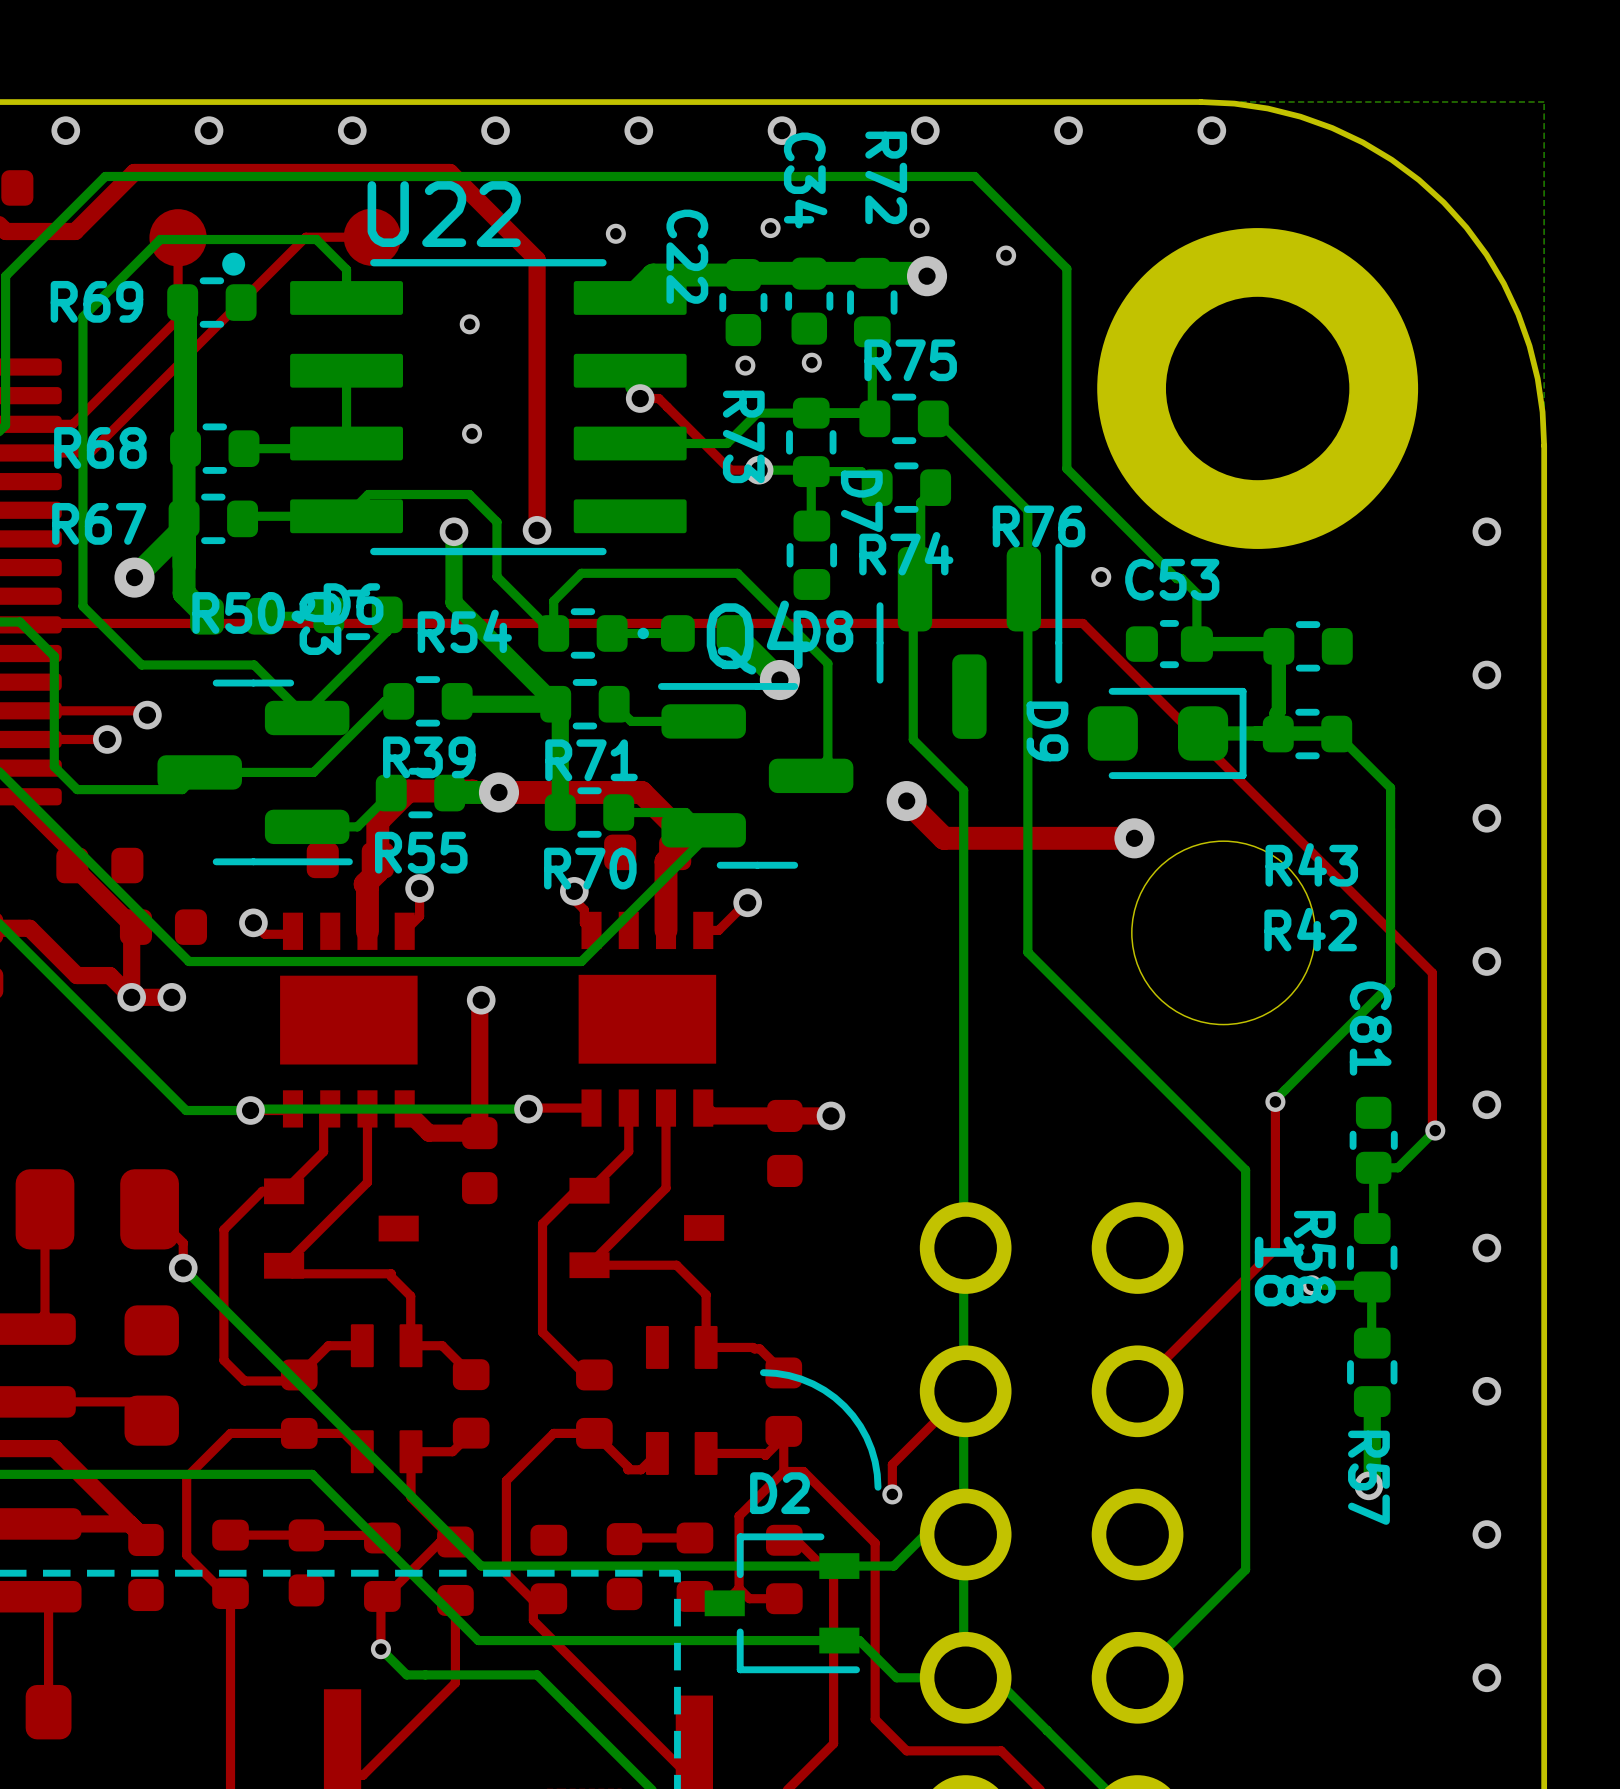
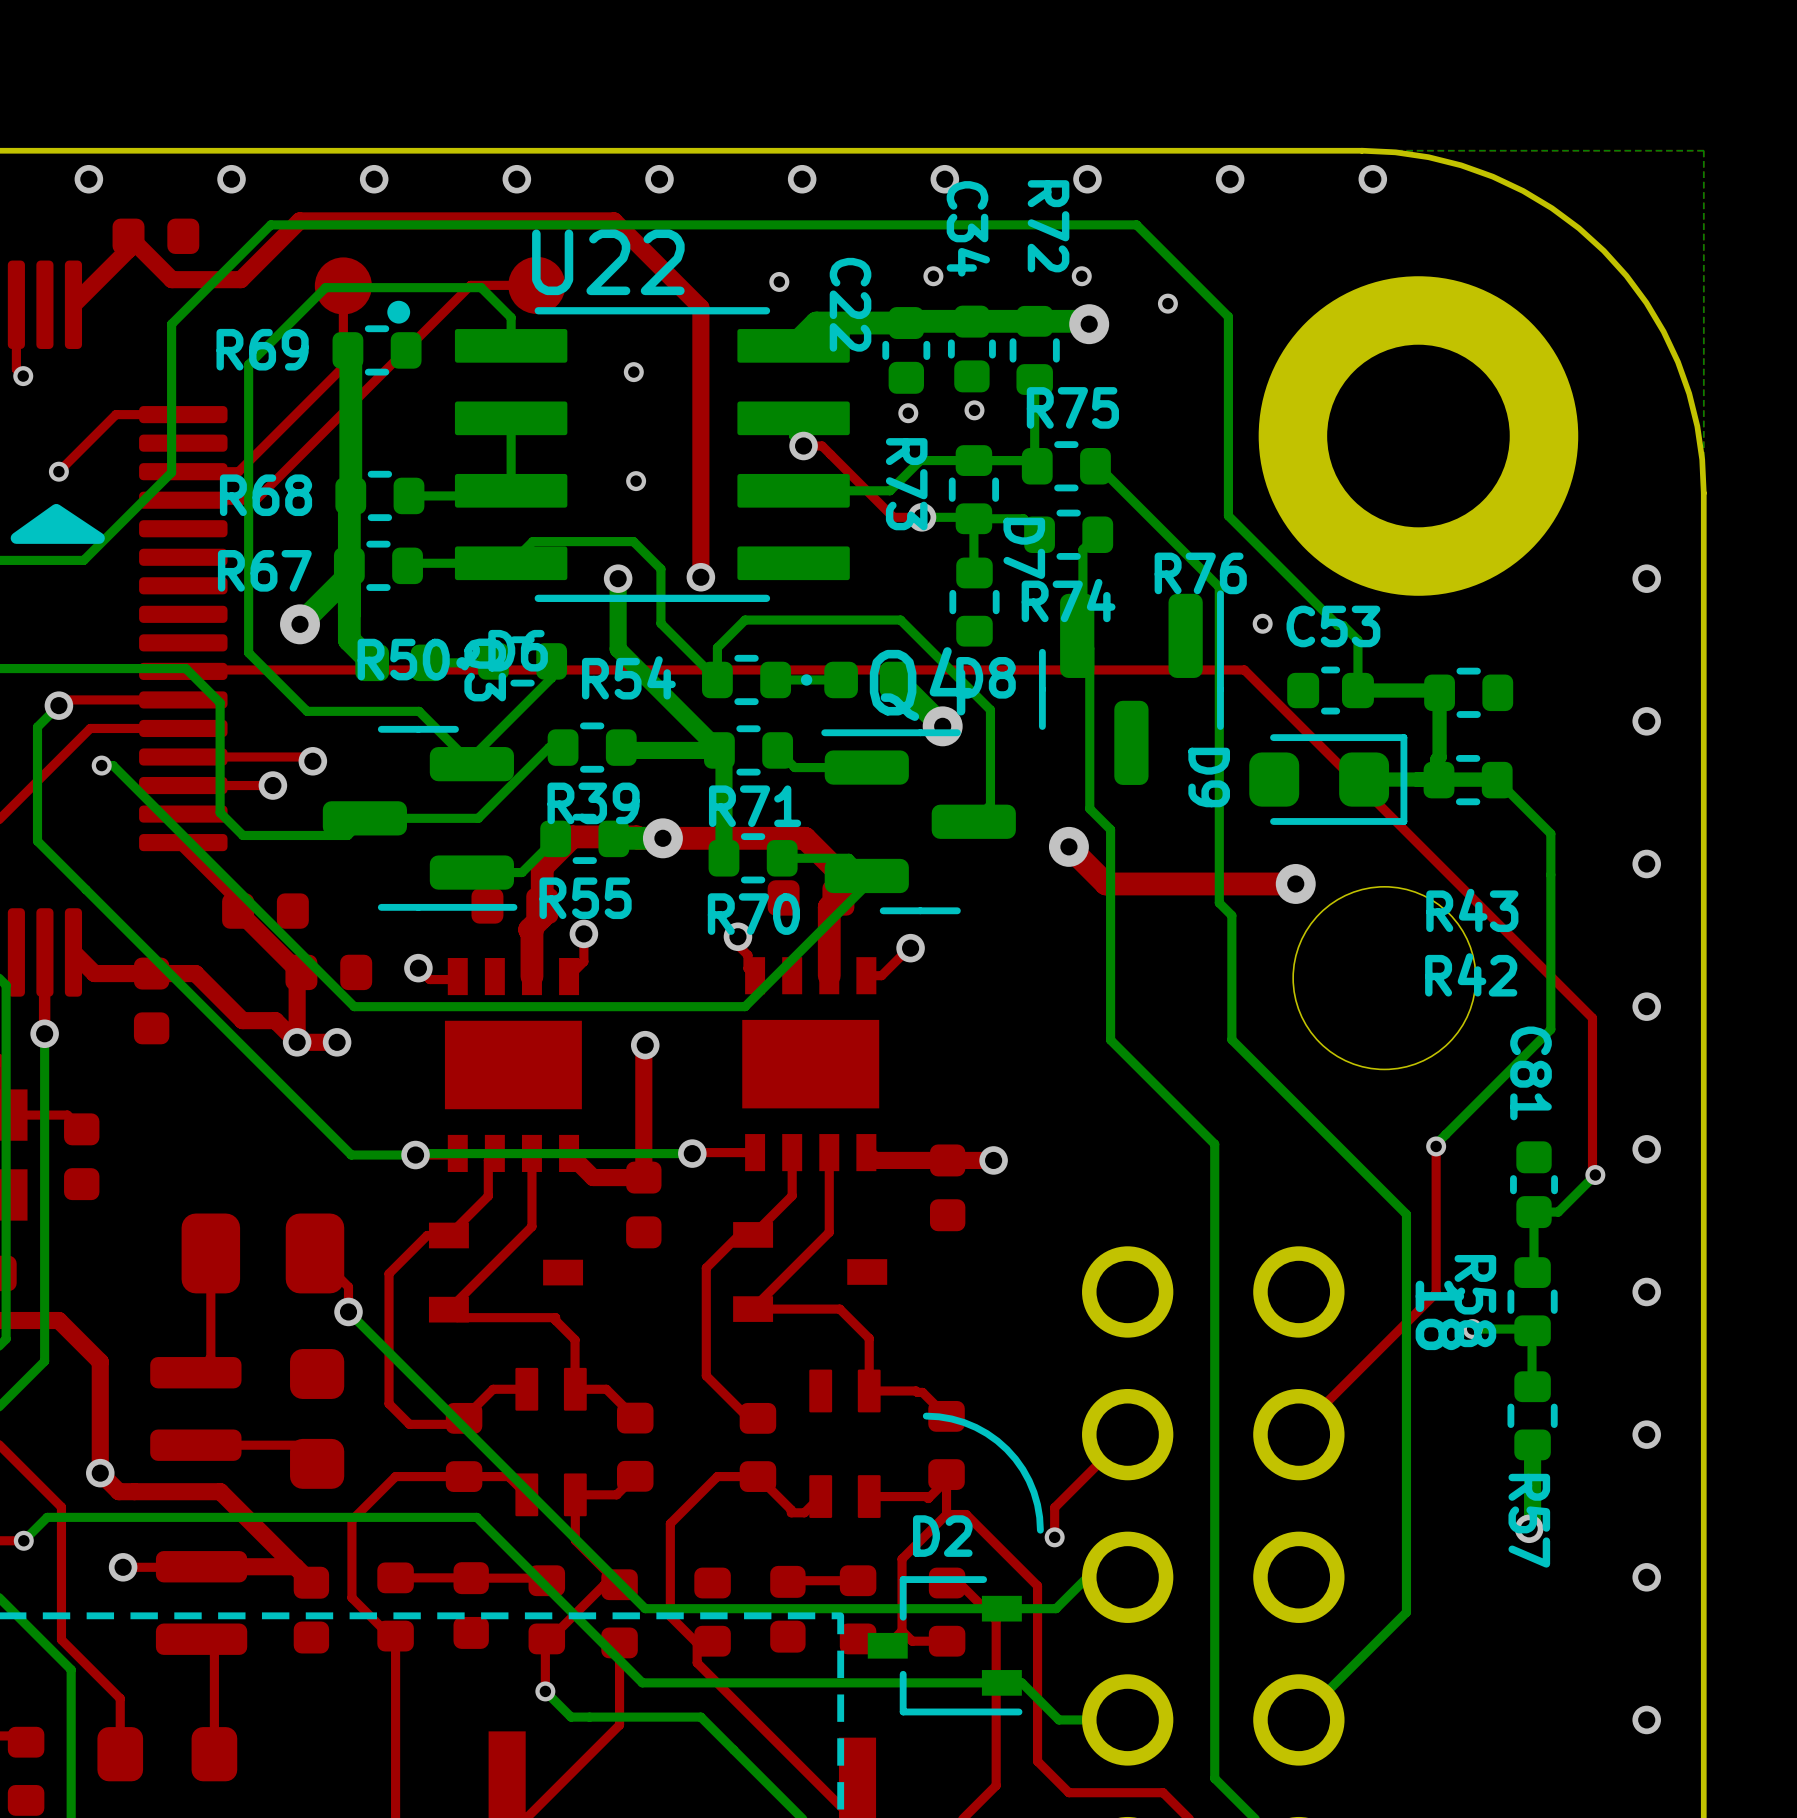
bottom track: (1027, 510) (1027, 952) (1070, 994) -> (1189, 557) (1219, 587) (1219, 902) (1231, 915) (1231, 1039)
bottom track: (914, 589) (913, 590) (913, 739) (963, 790) (963, 1647) (1053, 1736) -> (1077, 635) (1089, 648) (1089, 808) (1110, 829) (1110, 1040) (1214, 1144) (1214, 1778)

